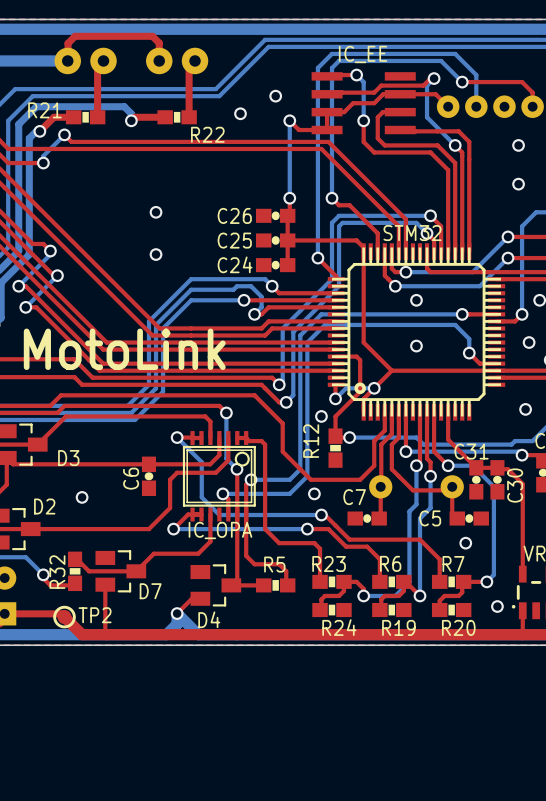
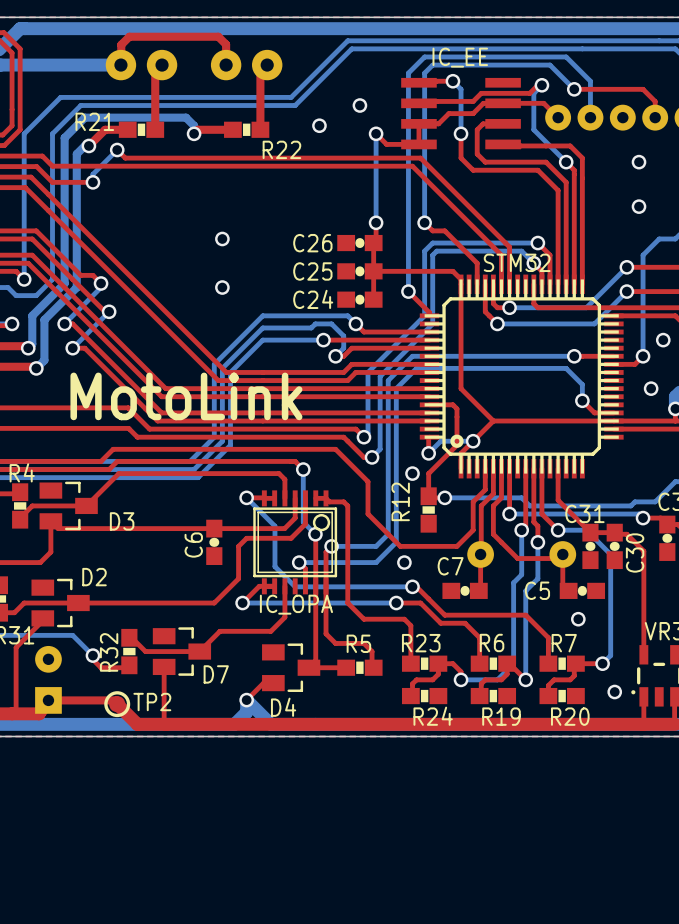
via: (416, 300) -> none
via: (416, 346) -> none
via: (525, 409) -> none
via: (82, 497) -> none

